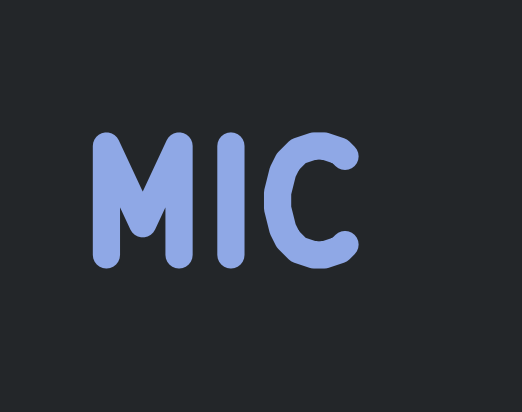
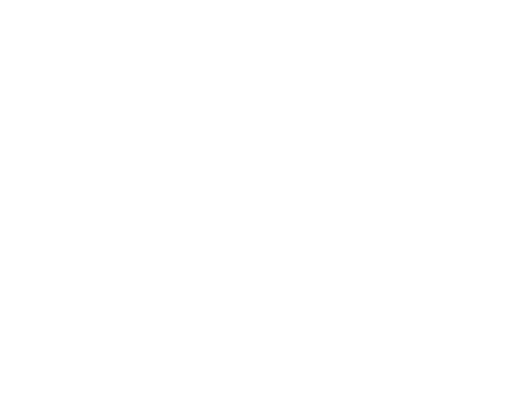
text: MIC (225, 200) -> none

